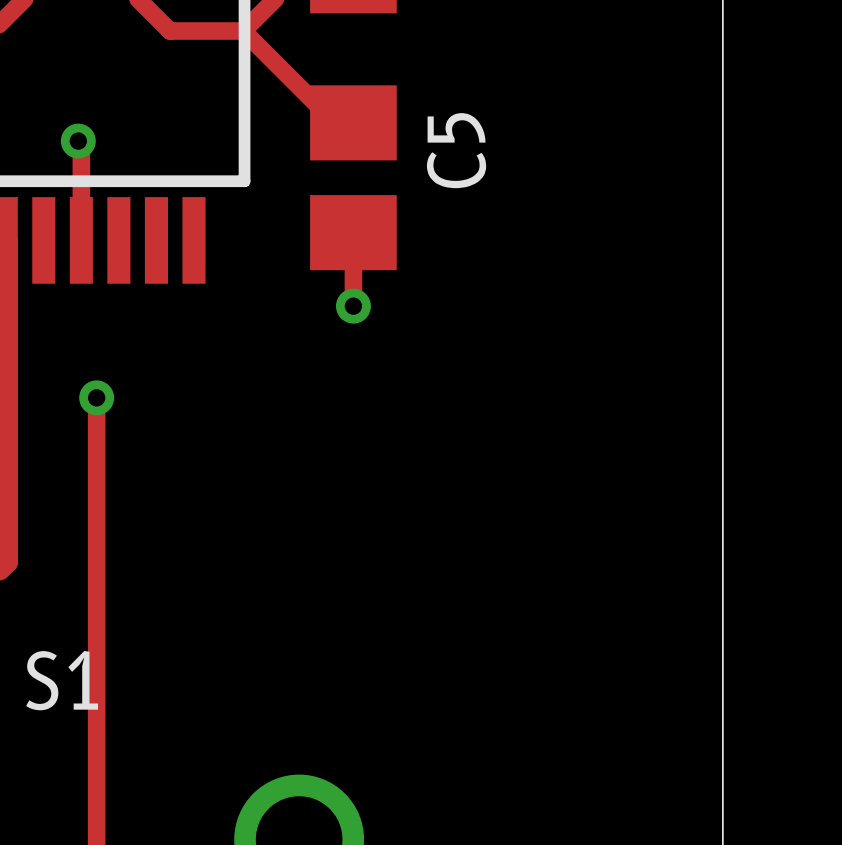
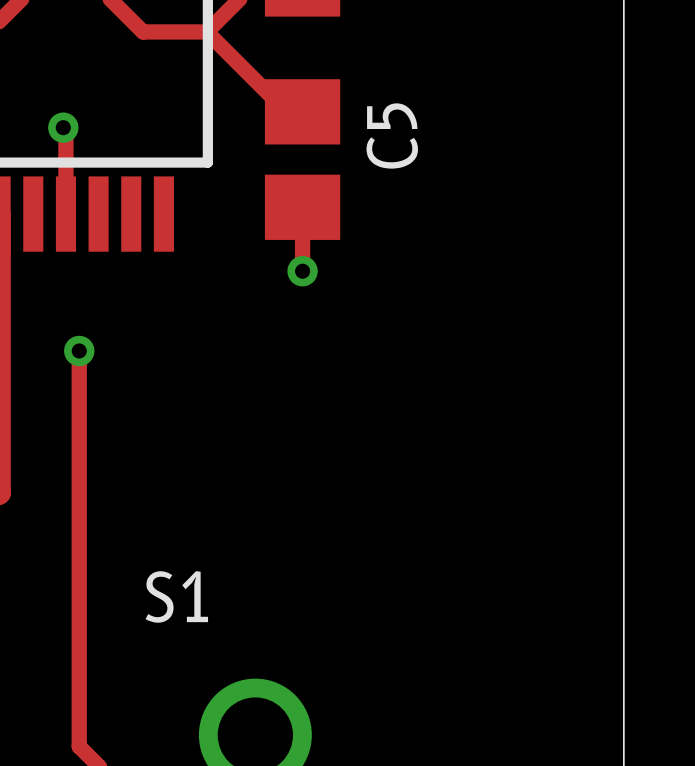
S1 name position: S1 (62, 680) -> S1 (176, 596)

